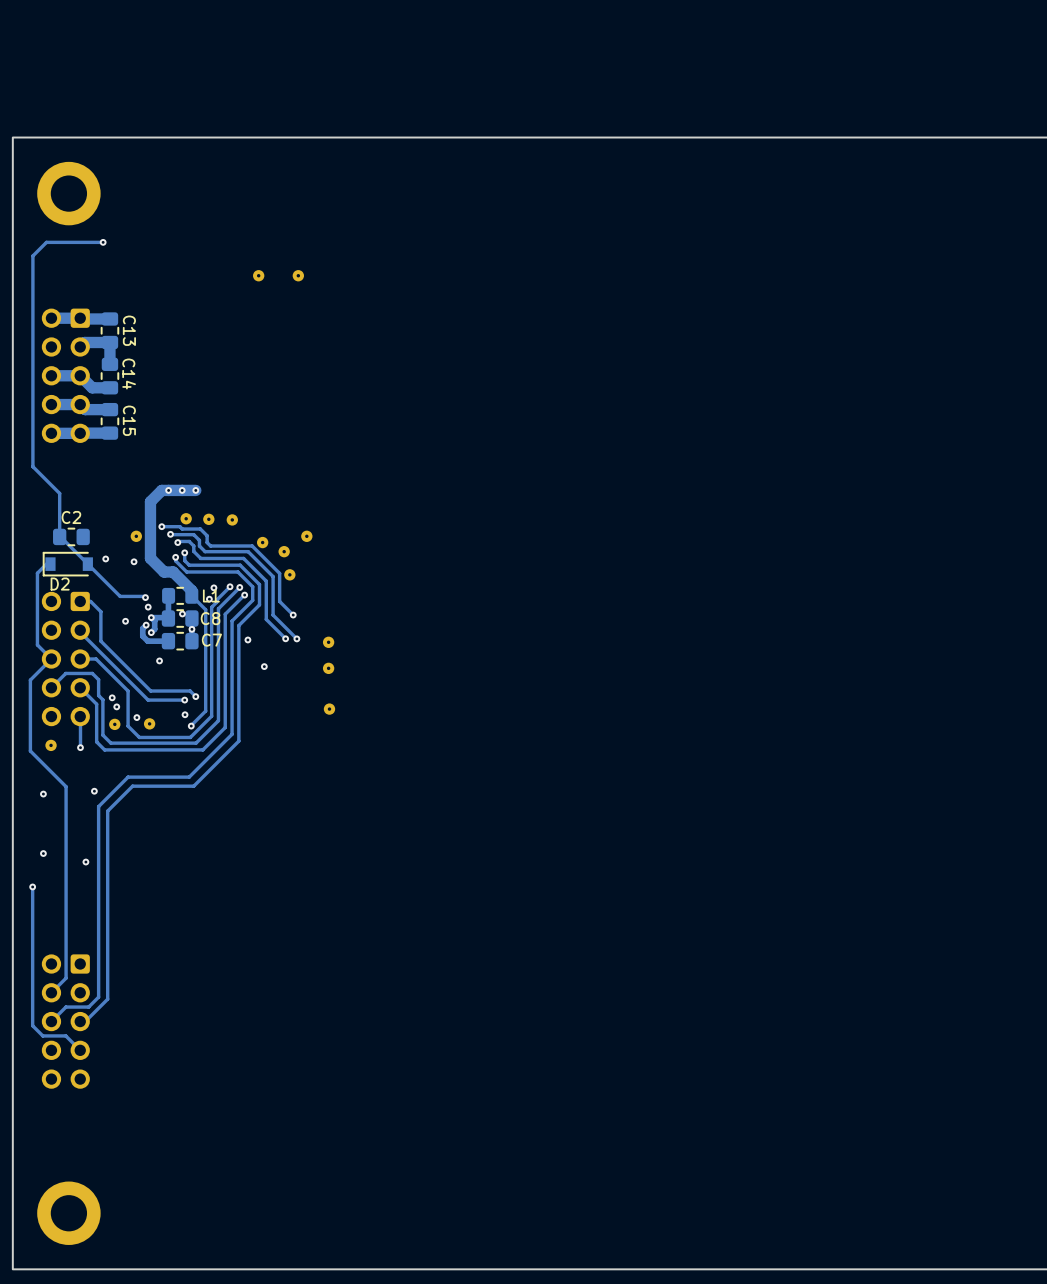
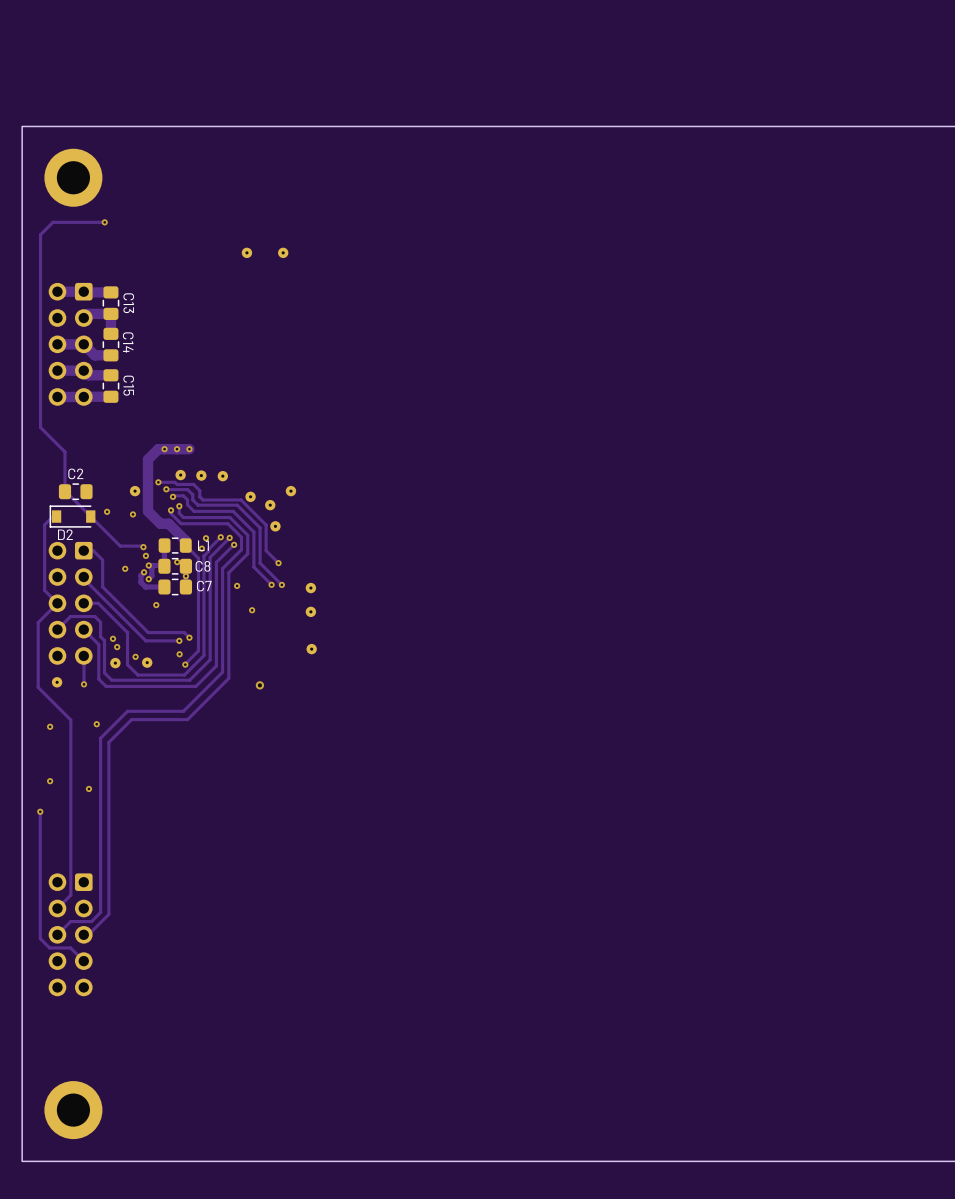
via: none -> (259, 685)

